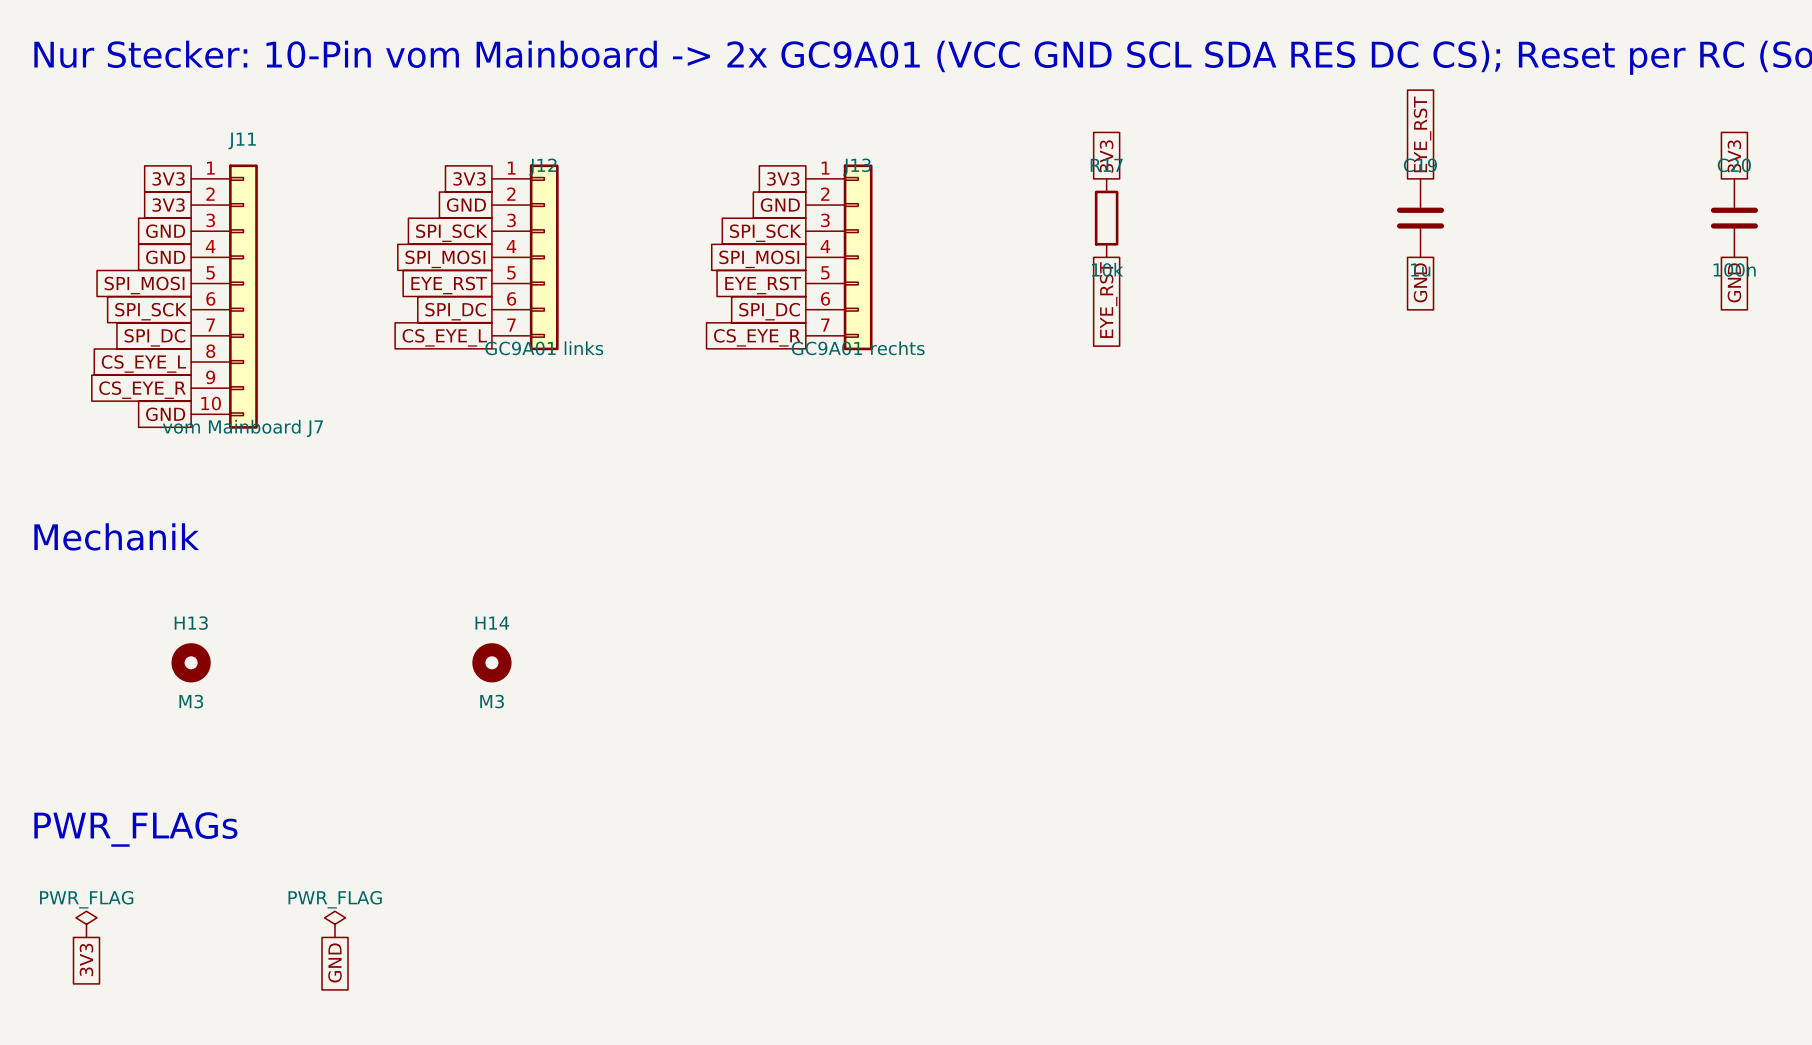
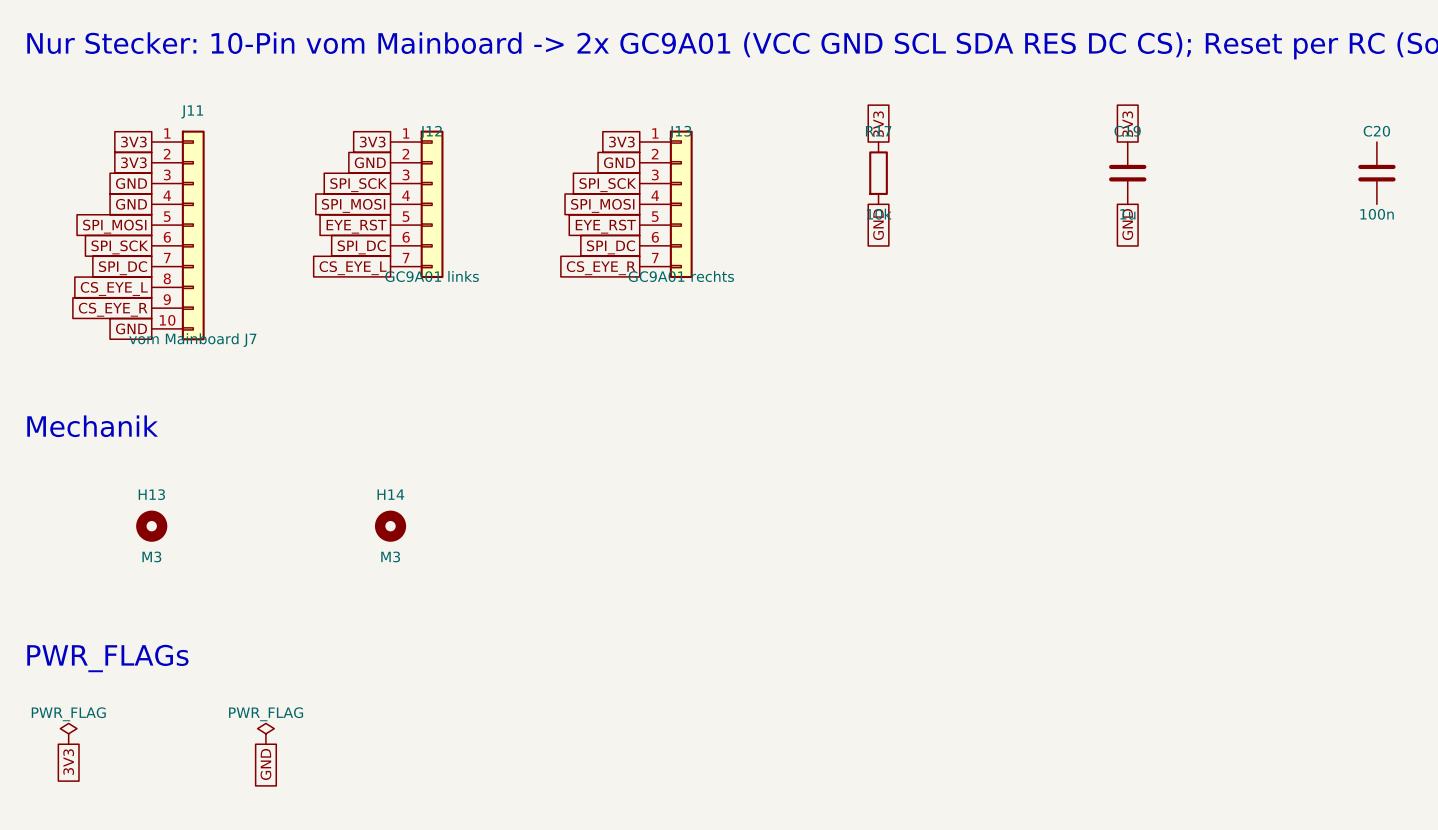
global label: EYE_RST (1422, 134) -> 3V3 (1127, 124)
global label: 3V3 (1734, 156) -> none
global label: GND (1734, 282) -> none
global label: EYE_RST (1108, 300) -> GND (878, 224)

